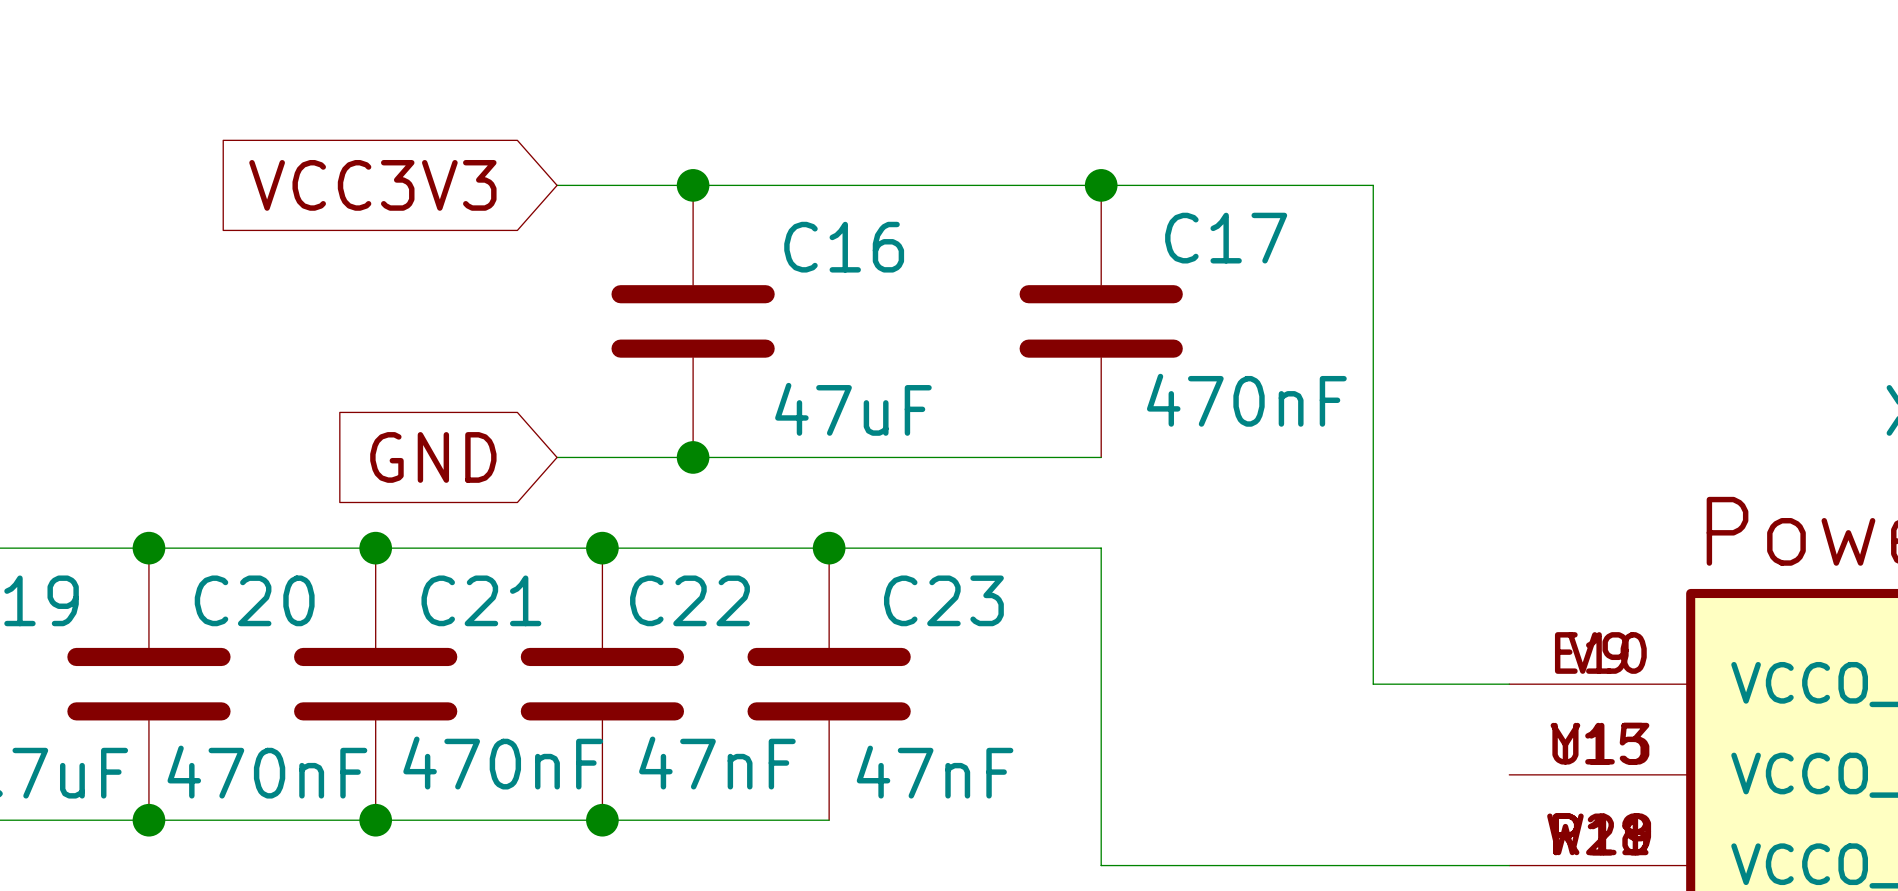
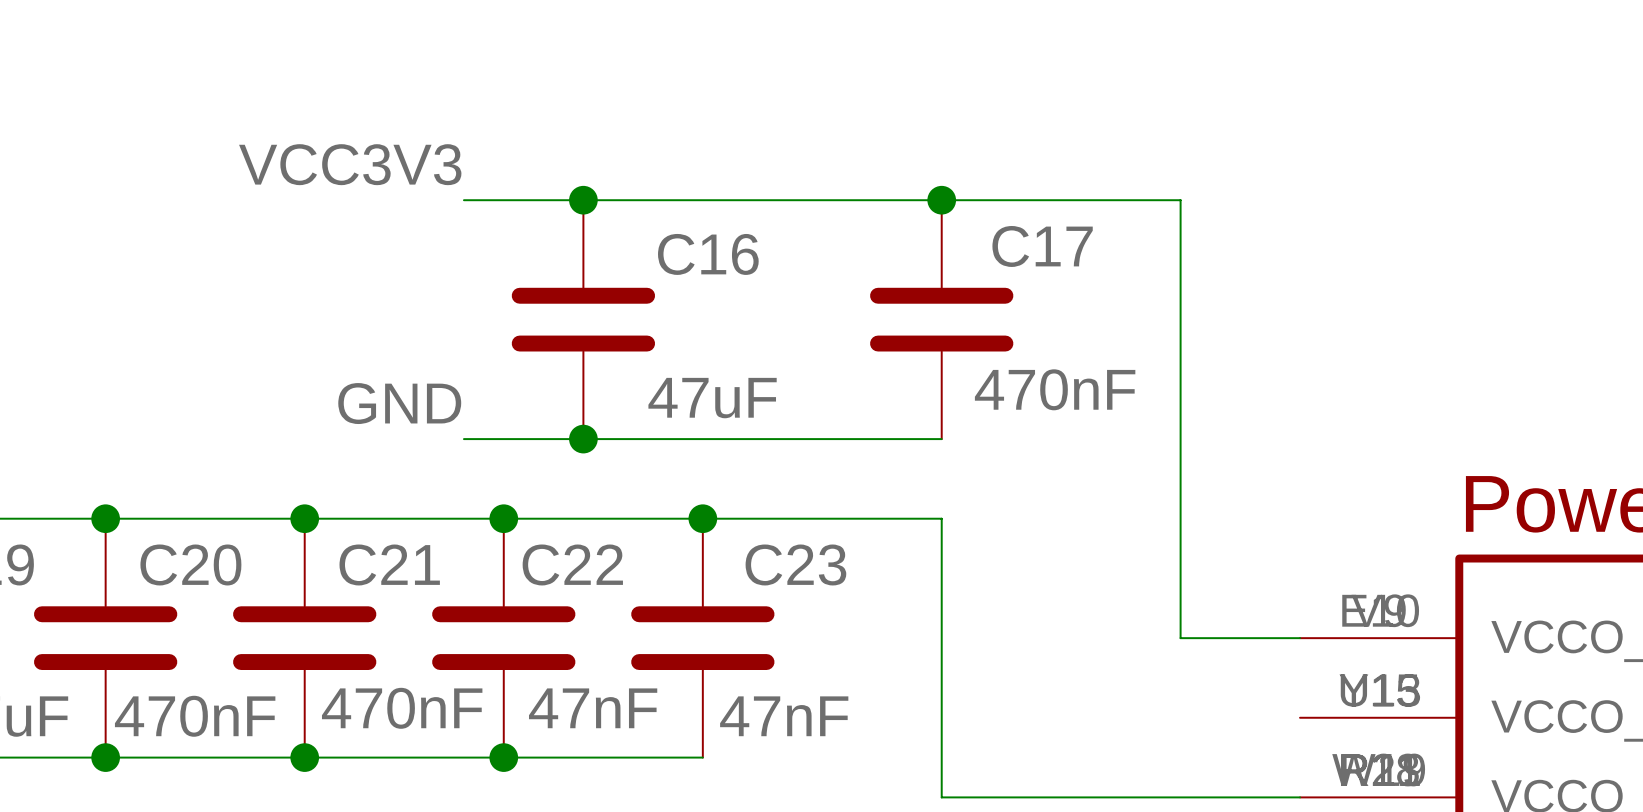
label: none -> VCC3V3 (350, 164)
global label: VCC3V3 (372, 185) -> none
label: none -> GND (399, 403)
global label: GND (433, 457) -> none

